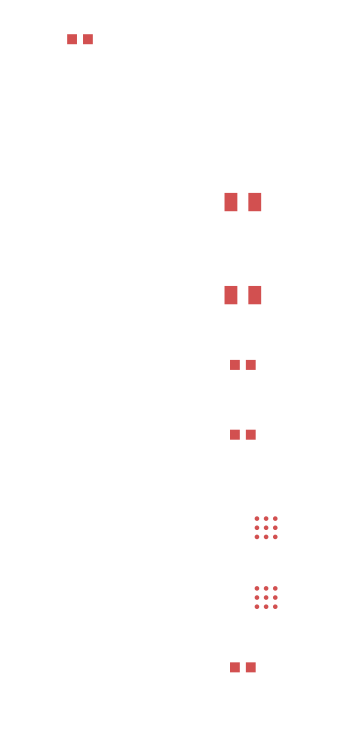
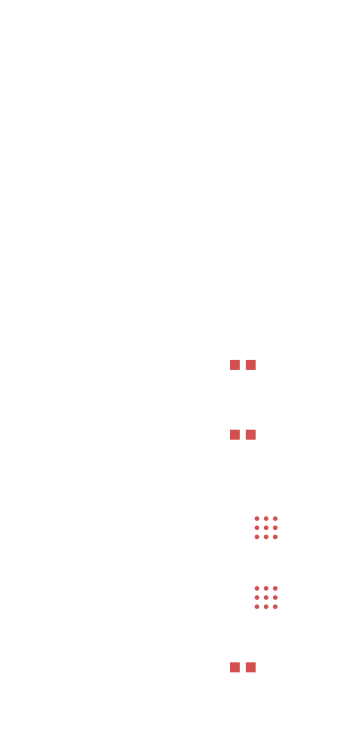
part: (79, 39) -> none
part: (242, 202) -> none
part: (242, 295) -> none

